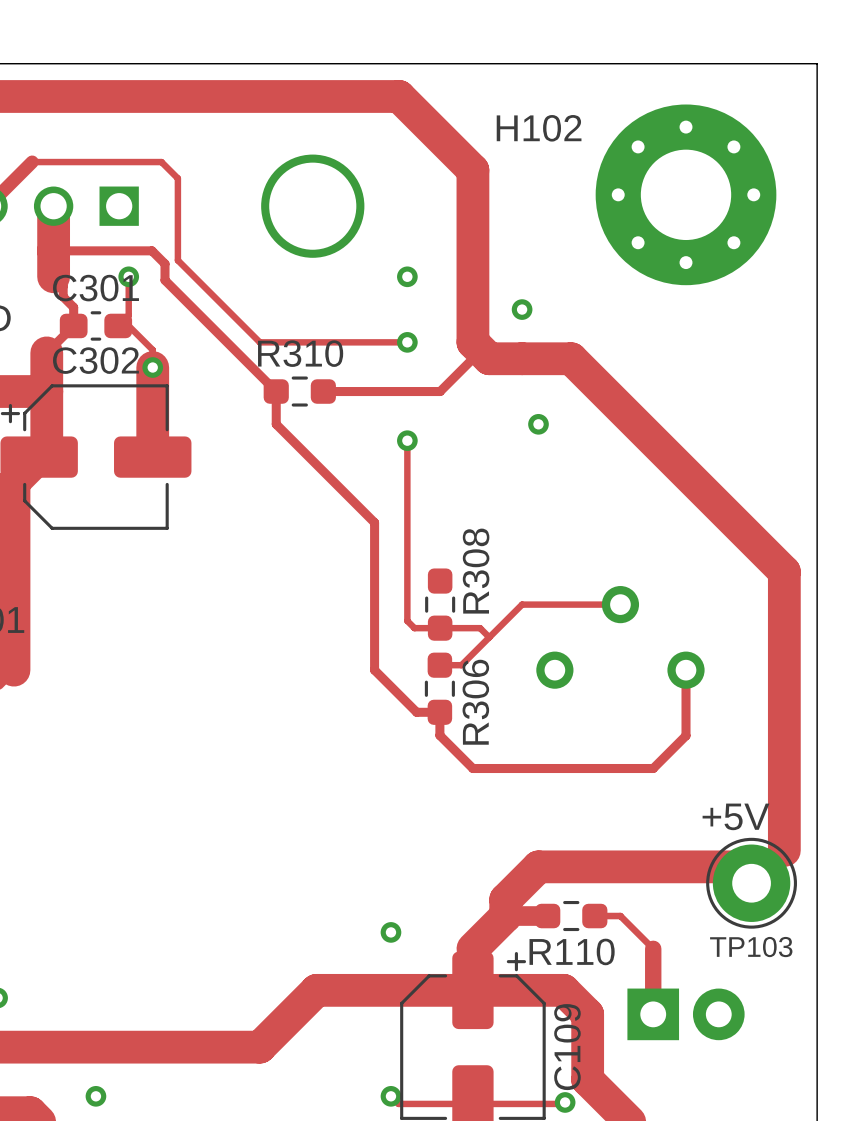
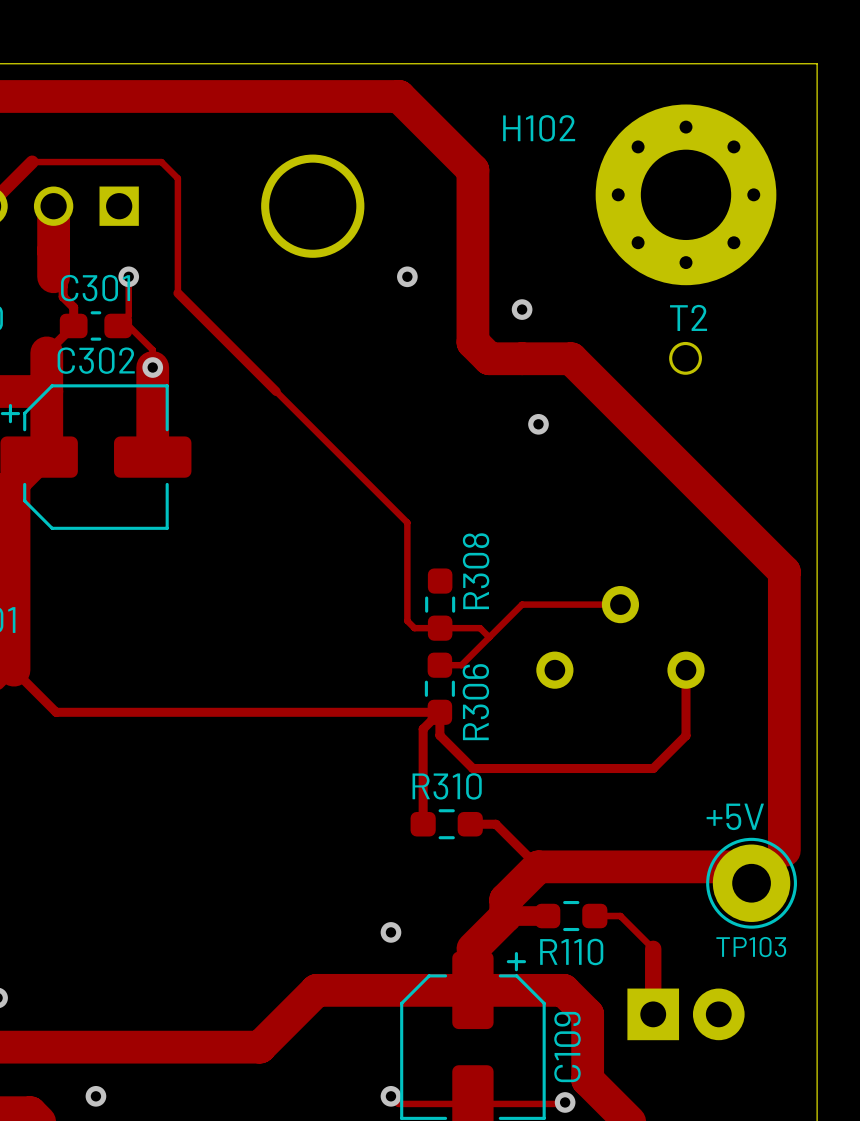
track: (53, 250) (151, 250) (165, 263) (165, 280) (177, 293) -> (177, 260) (177, 293)
track: (177, 260) (259, 342) (407, 342) -> none
via: (407, 342) -> none
track: (472, 358) (440, 391) (323, 391) -> none
T2: none -> (685, 358)
track: (276, 391) (276, 424) (374, 522) (374, 670) (416, 712) -> (13, 670) (56, 712) (416, 712)
R310 position: (299, 391) -> (446, 824)
track: (407, 440) (407, 522) -> (276, 391) (407, 522)
via: (407, 440) -> none
track: none -> (439, 712) (423, 729) (423, 824)
track: none -> (470, 824) (495, 824) (538, 866)

